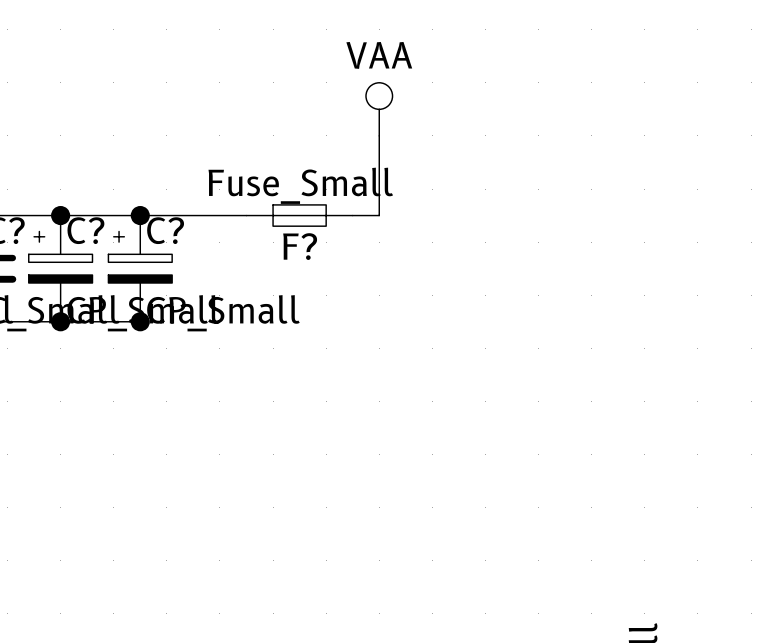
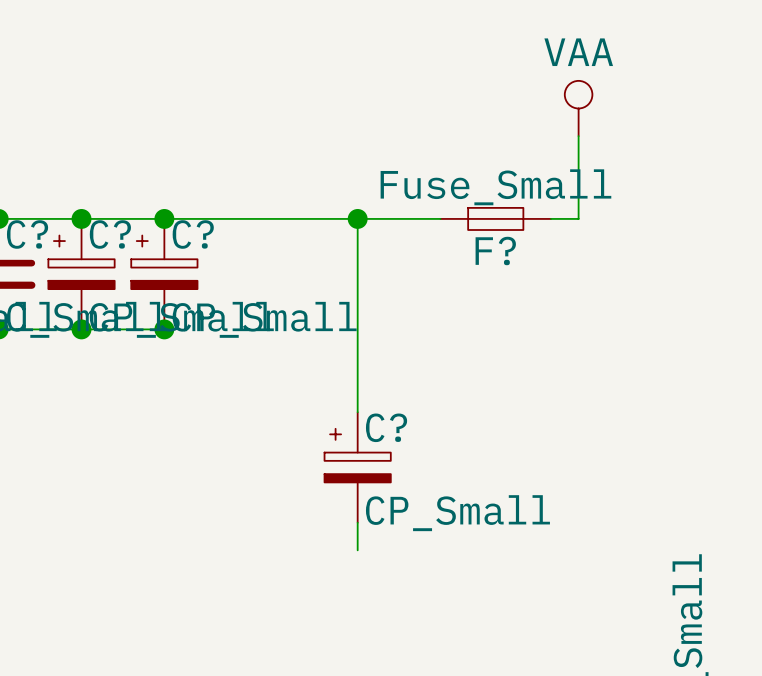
power symbol position: VAA (379, 109) -> VAA (578, 108)
wire: (379, 135) (379, 215) -> (440, 218) (412, 218)
wire: none -> (578, 136) (578, 218) (550, 218)
F? position: (299, 215) -> (495, 218)
wire: none -> (357, 218) (357, 412)
junction: none -> (357, 218)
C?: none -> CP_Small (357, 467)
wire: none -> (357, 522) (357, 550)

